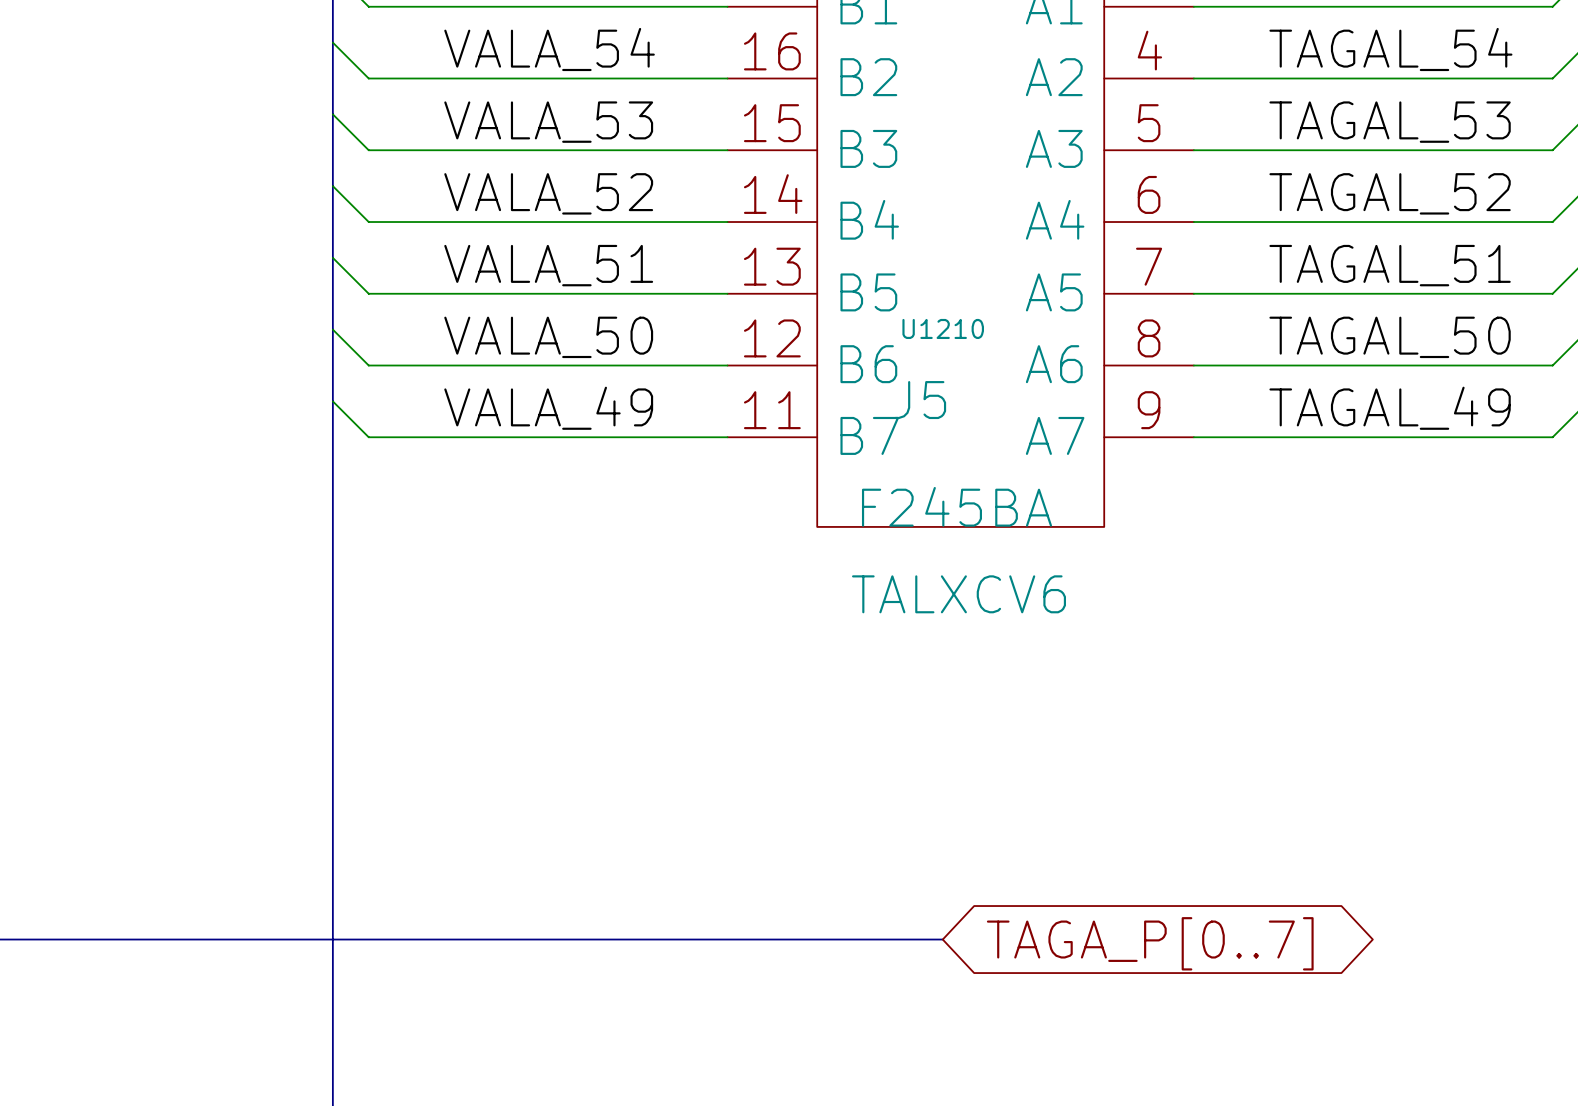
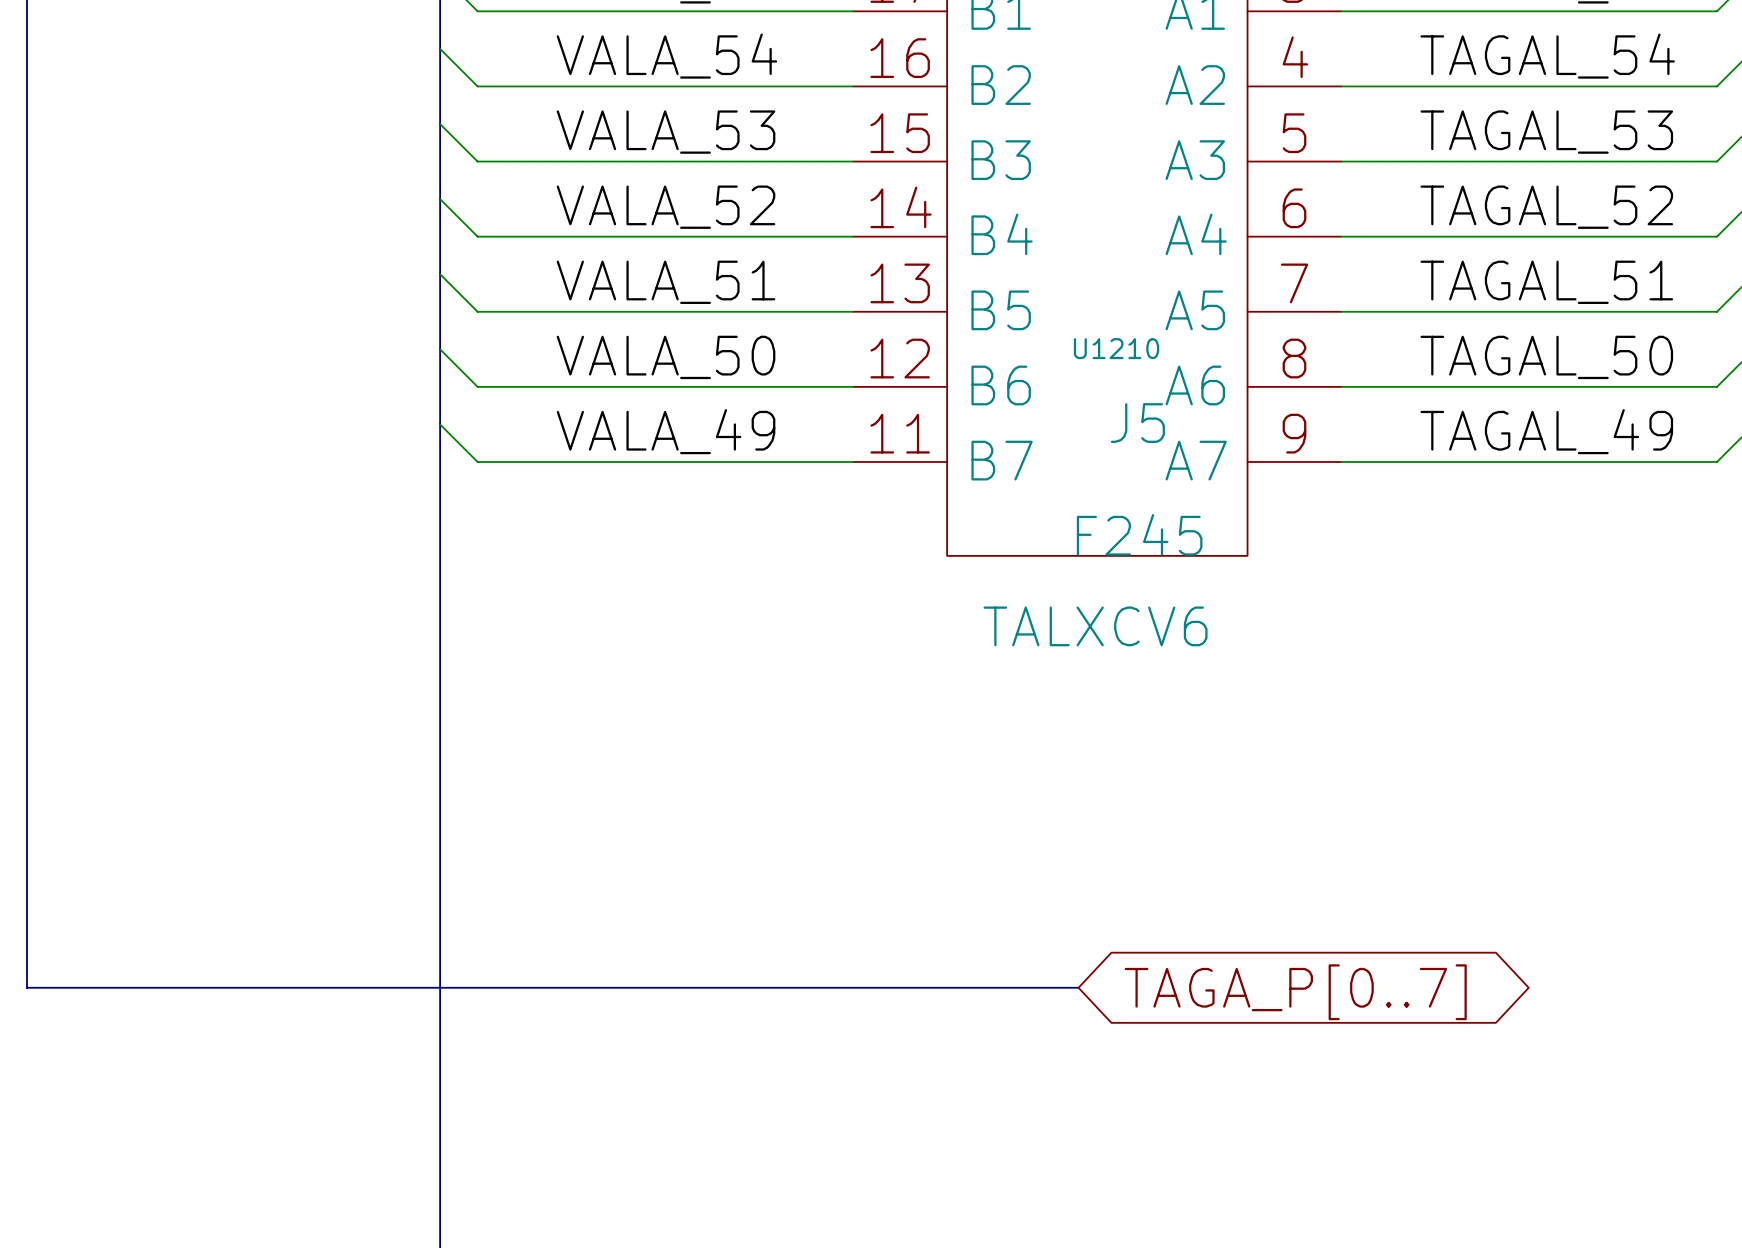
U1210 name position: U1210 (943, 328) -> U1210 (1116, 348)
U1210 text position: J5 (920, 400) -> J5 (1137, 423)
U1210 value: F245BA (957, 506) -> F245 (1139, 534)

